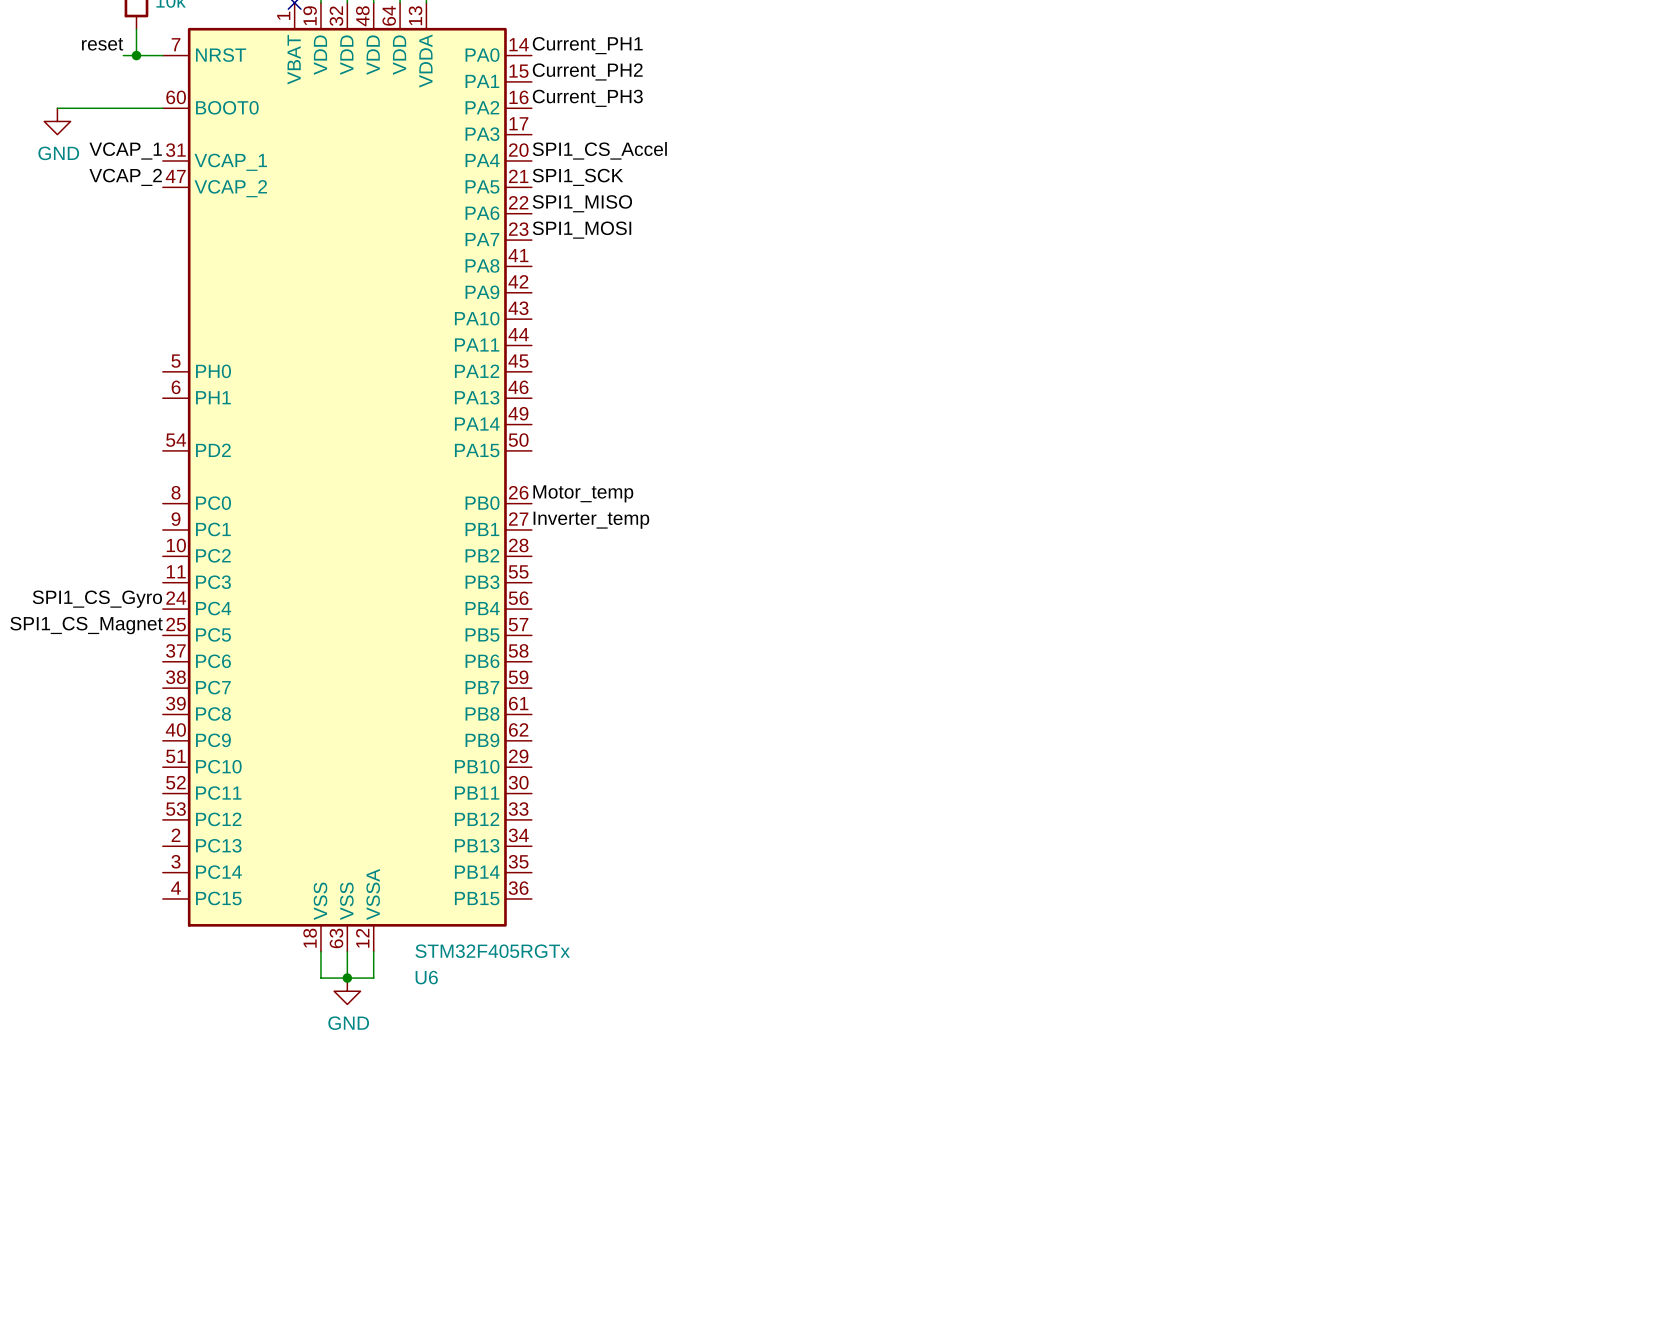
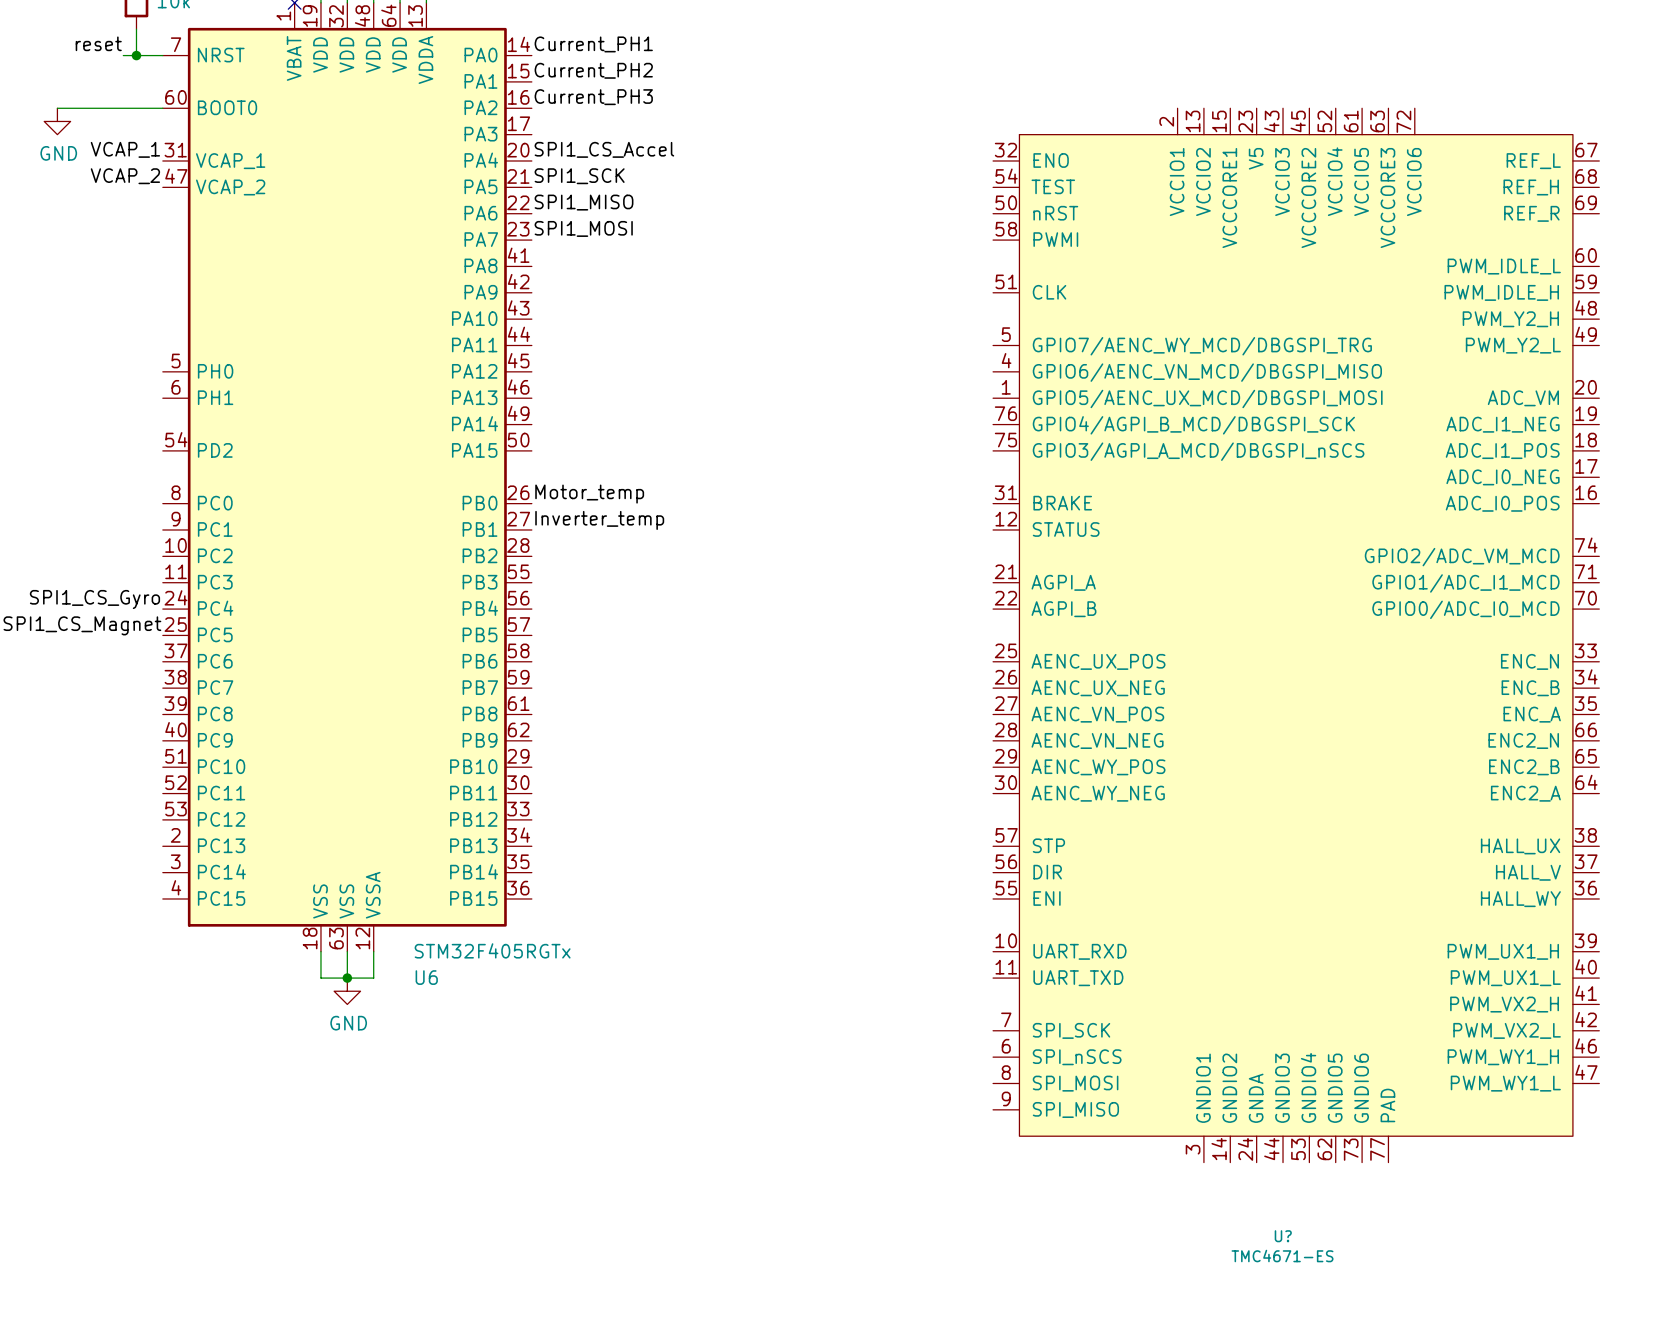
U?: none -> TMC4671-ES (1296, 635)

